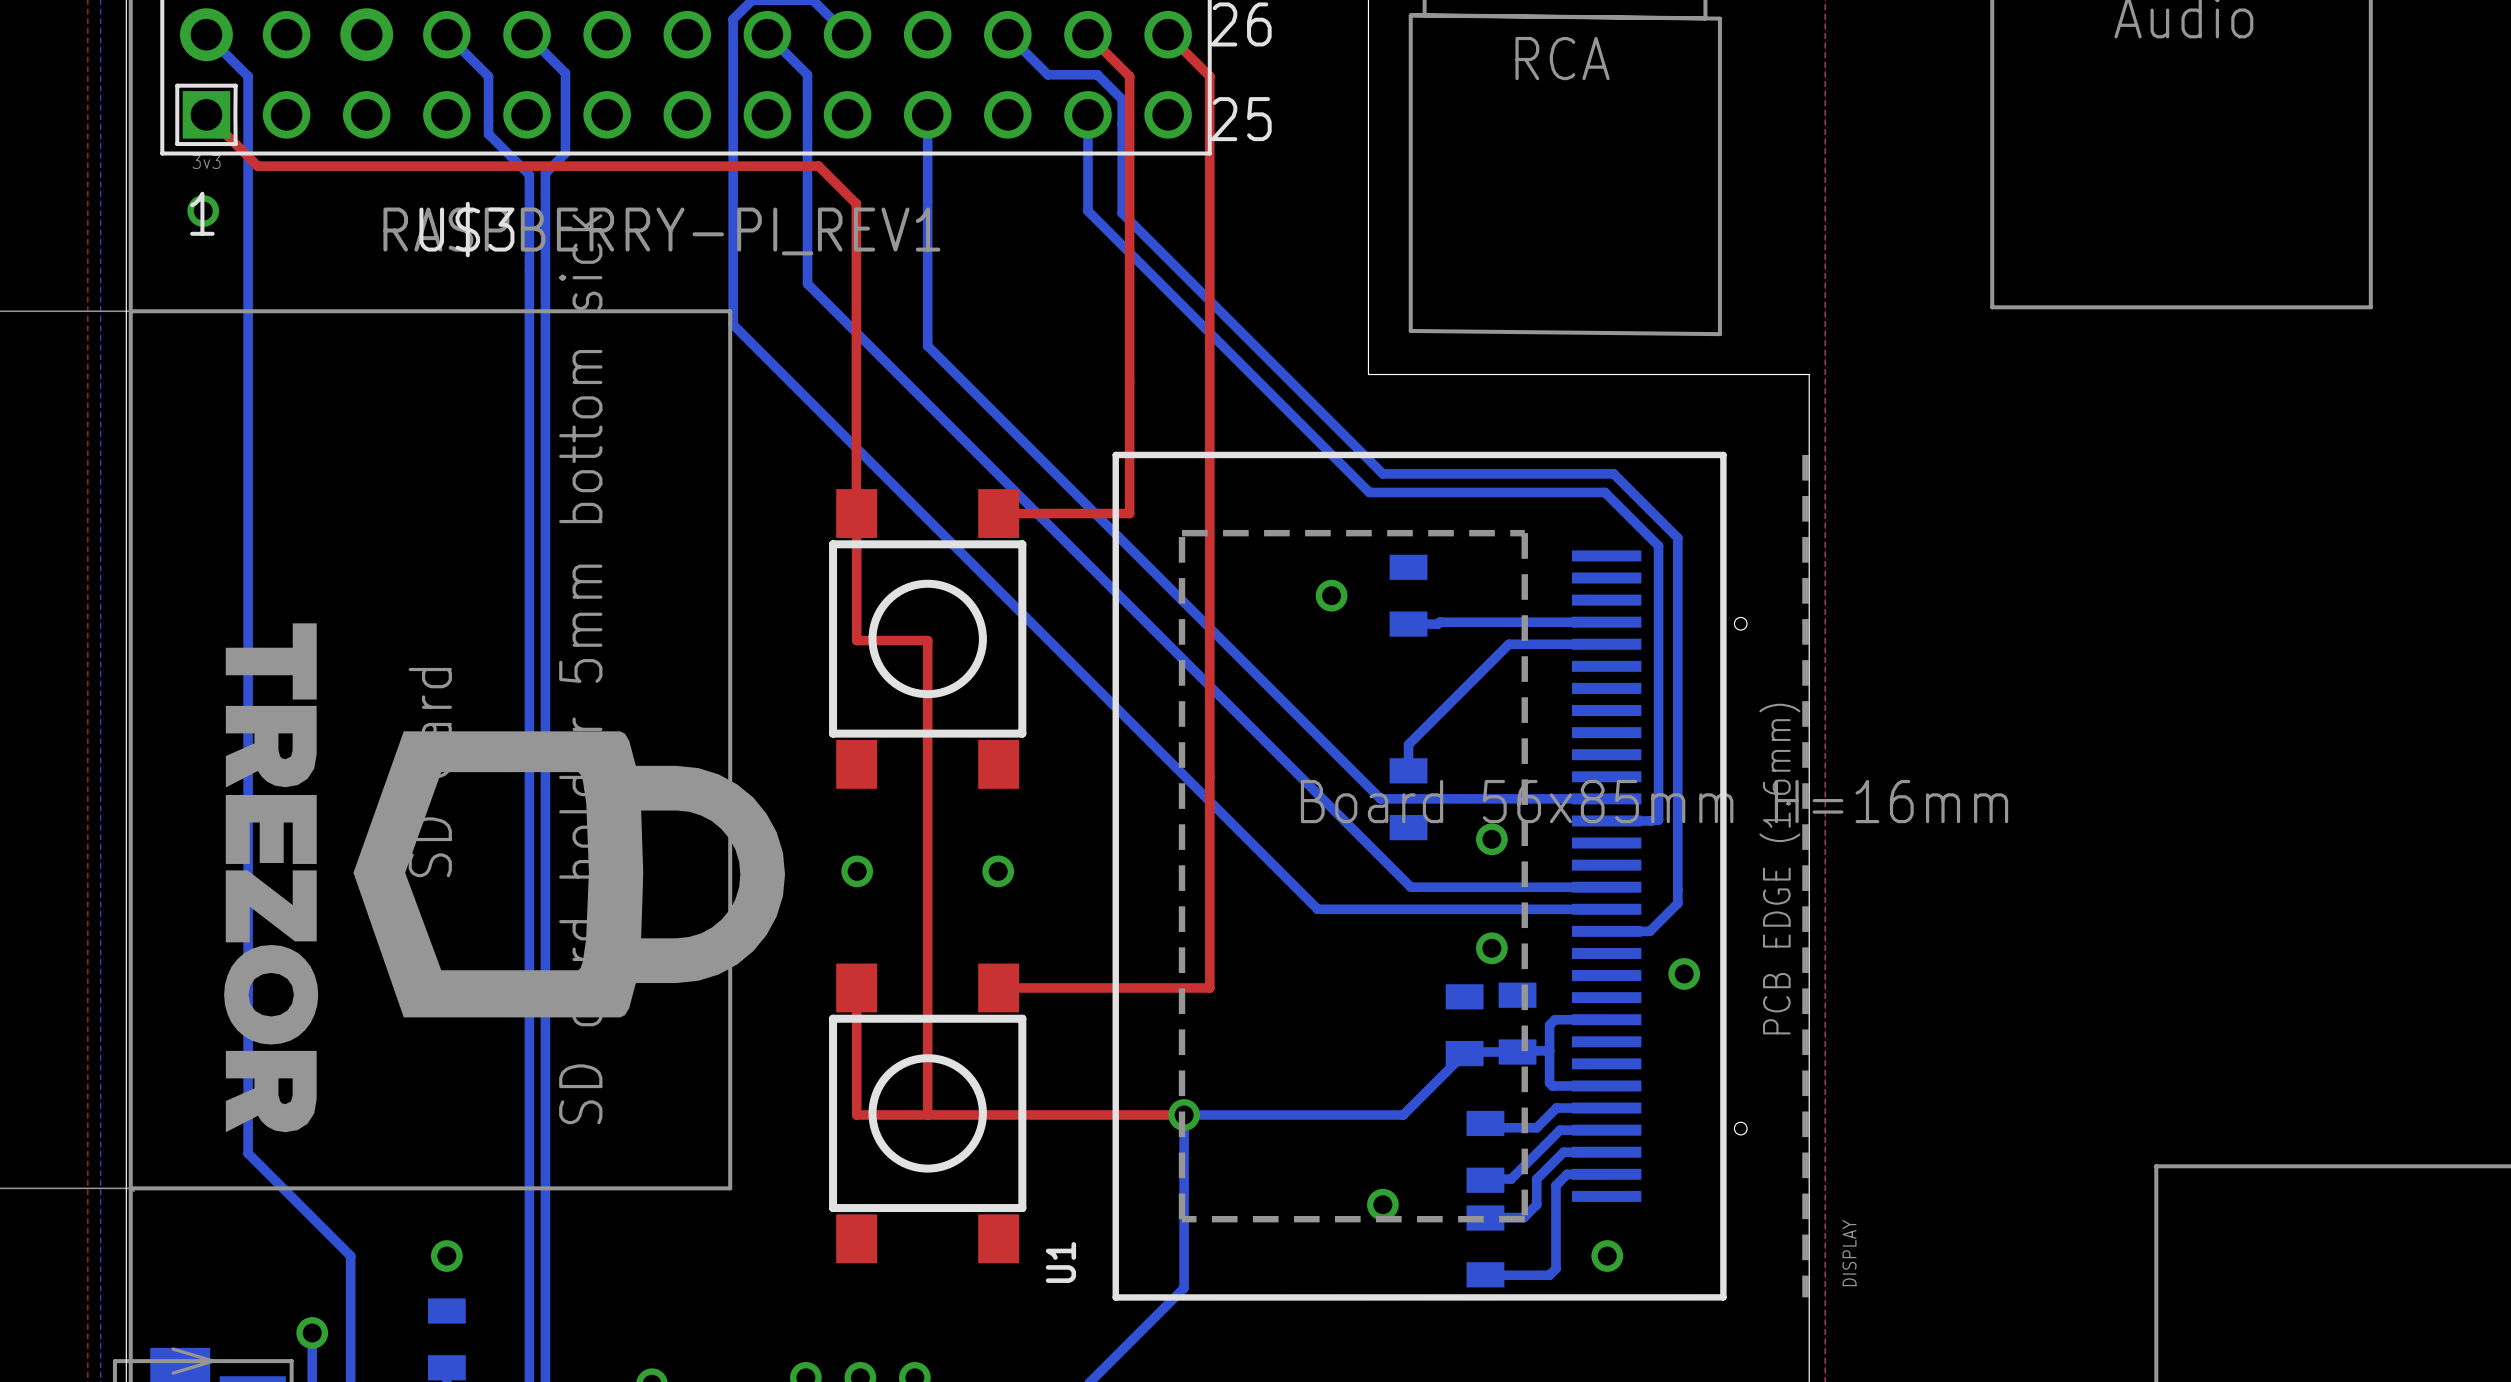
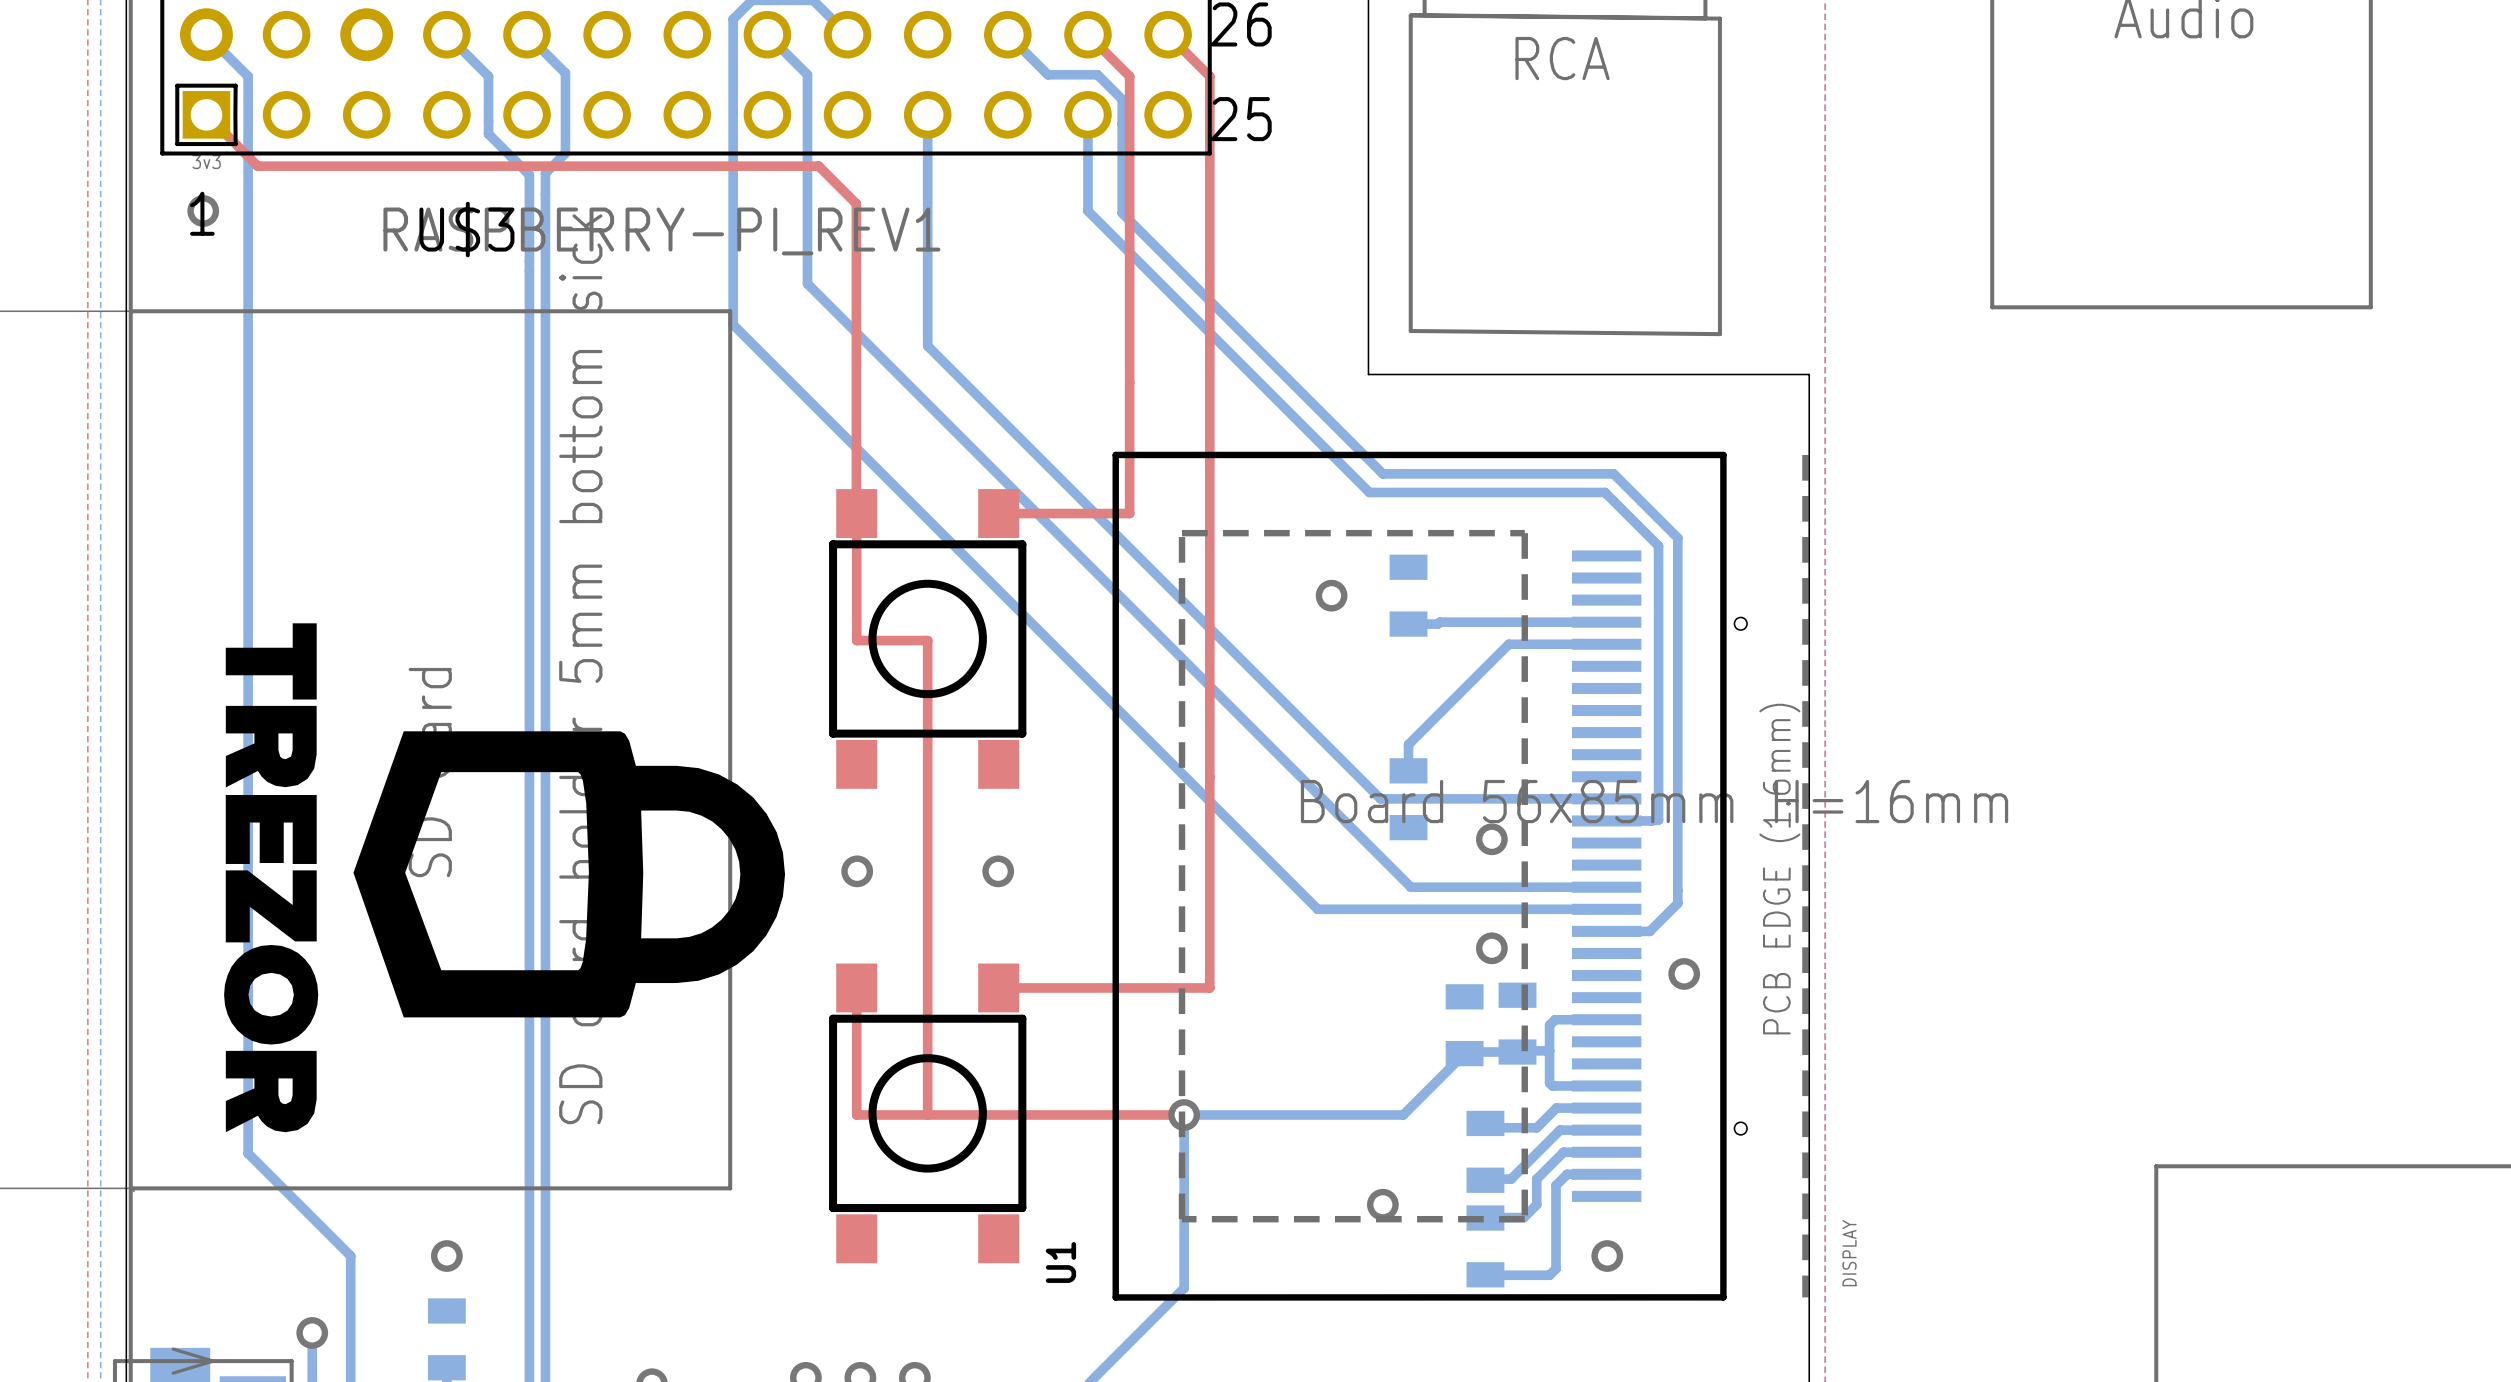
drawing shape: [225, 623, 317, 700] -> [225, 623, 317, 700]
drawing shape: [225, 705, 317, 739] -> [225, 705, 317, 739]
drawing shape: [353, 731, 785, 873] -> [353, 731, 785, 873]
drawing shape: [225, 738, 317, 788] -> [225, 738, 317, 788]
drawing shape: [225, 794, 317, 864] -> [225, 794, 317, 864]
drawing shape: [225, 870, 317, 943] -> [225, 870, 317, 943]
drawing shape: [353, 872, 786, 1018] -> [353, 872, 786, 1018]
drawing shape: [224, 944, 319, 995] -> [224, 944, 319, 995]
drawing shape: [224, 994, 319, 1045] -> [224, 994, 319, 1045]
drawing shape: [225, 1050, 317, 1084] -> [225, 1050, 317, 1084]
drawing shape: [225, 1083, 317, 1133] -> [225, 1083, 317, 1133]

